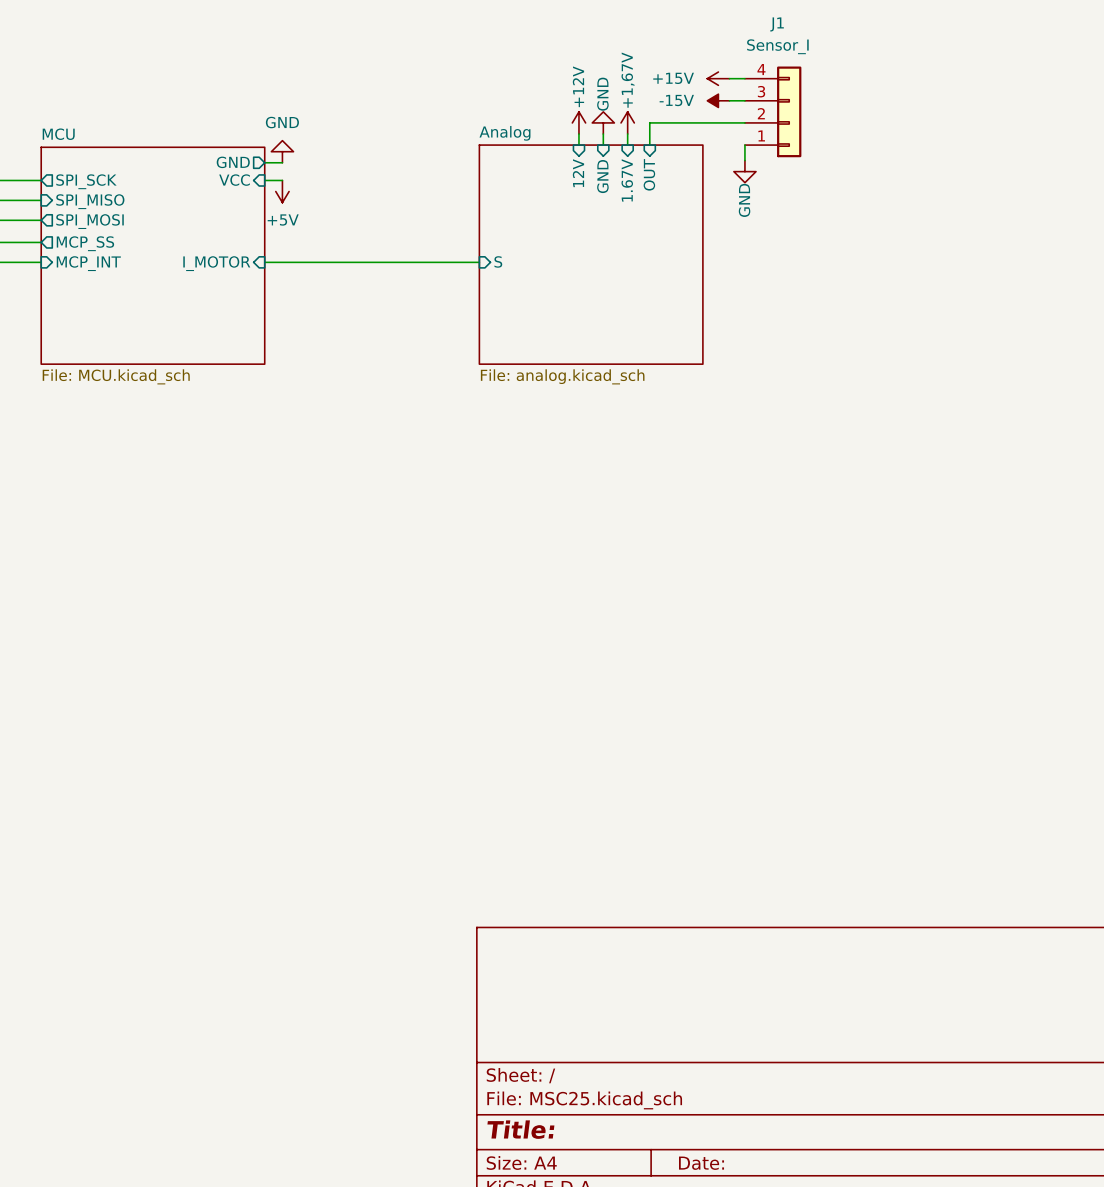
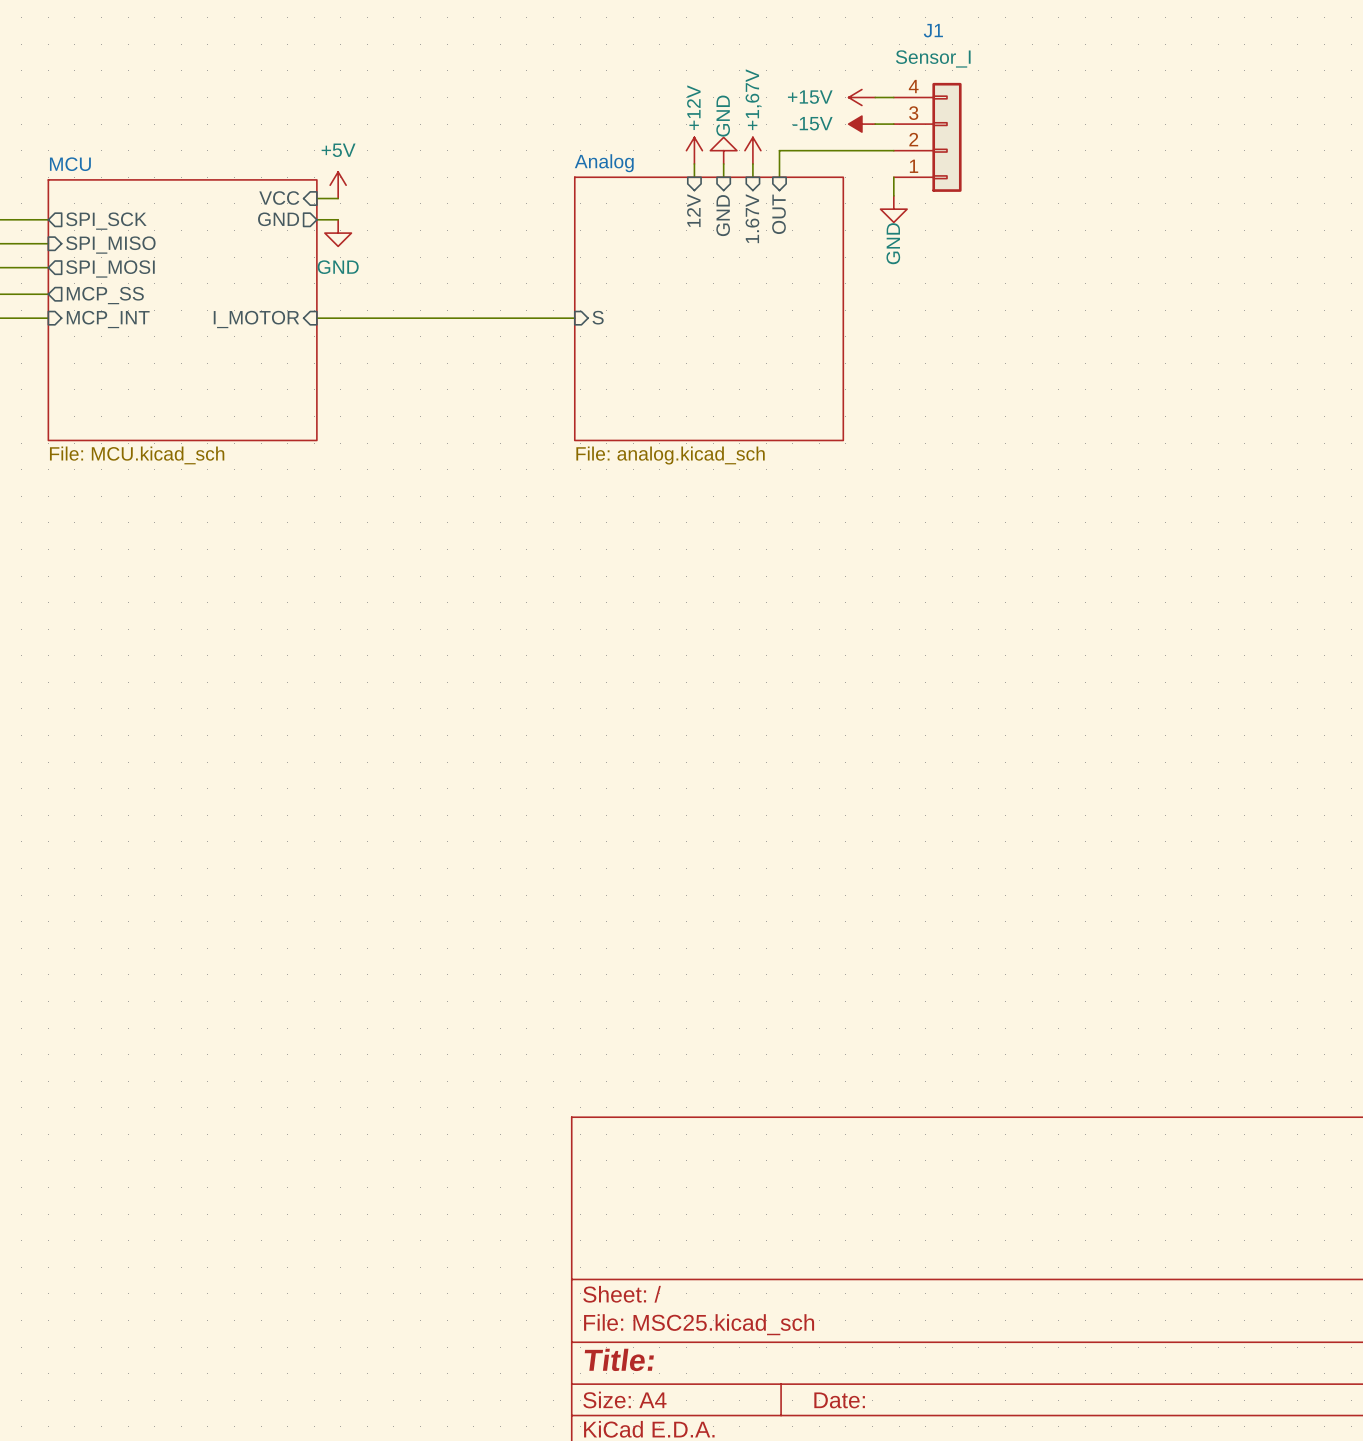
power symbol: GND (282, 151) -> +5V (338, 185)
sheet pin shape: output (233, 162) -> input (279, 198)
sheet pin: GND (233, 162) -> VCC (279, 198)
sheet pin shape: input (234, 180) -> output (278, 219)
sheet pin: VCC (234, 180) -> GND (278, 219)
power symbol: +5V (282, 191) -> GND (338, 233)

